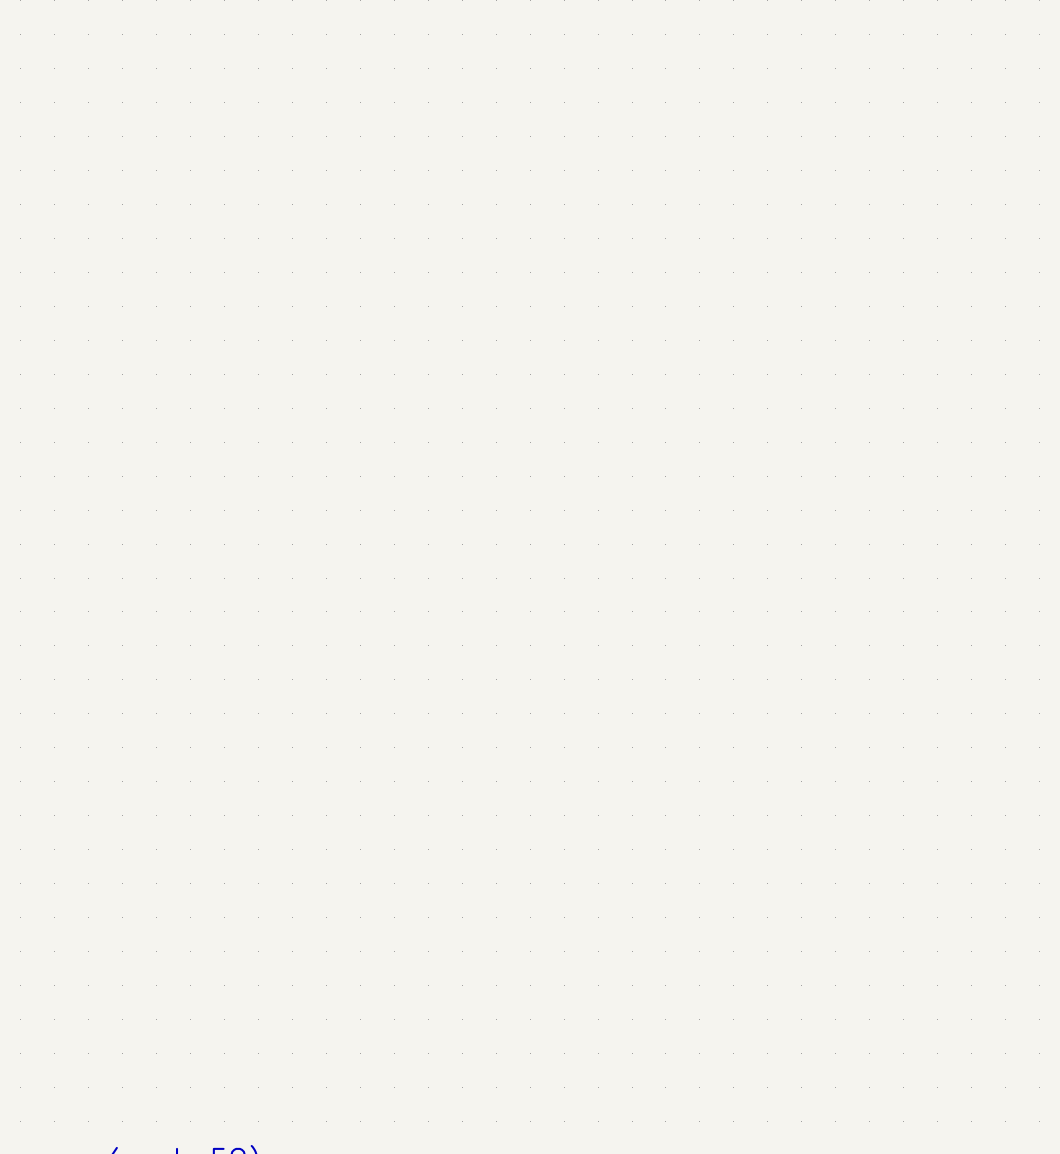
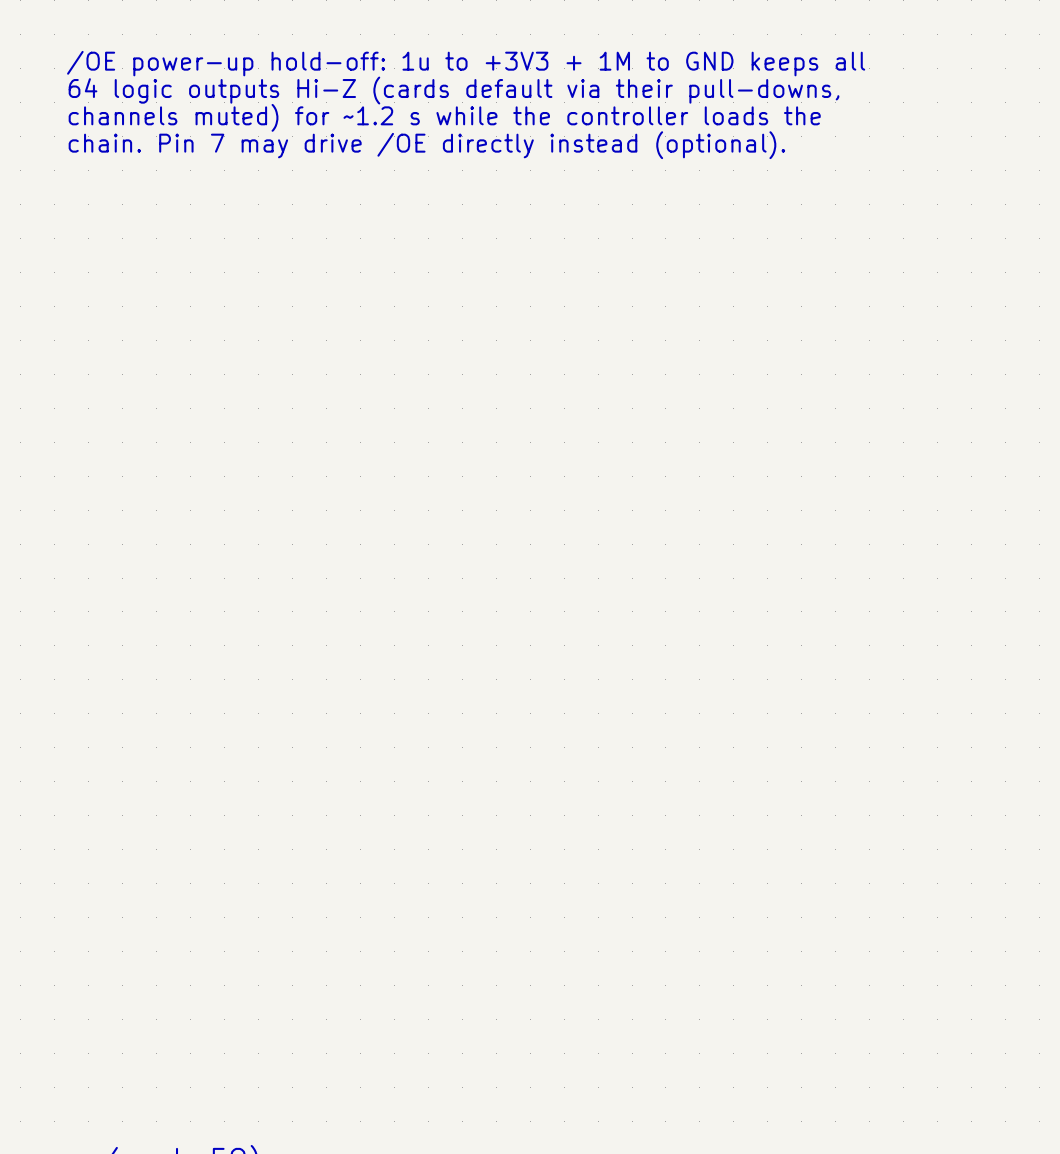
text: none -> /OE power-up hold-off: 1u to +3V3 + 1M to GND keeps all (466, 63)
text: none -> 64 logic outputs Hi-Z (cards default via their pull-downs, (454, 90)
text: none -> channels muted) for ~1.2 s while the controller loads the (444, 117)
text: none -> chain. Pin 7 may drive /OE directly instead (optional). (426, 145)

